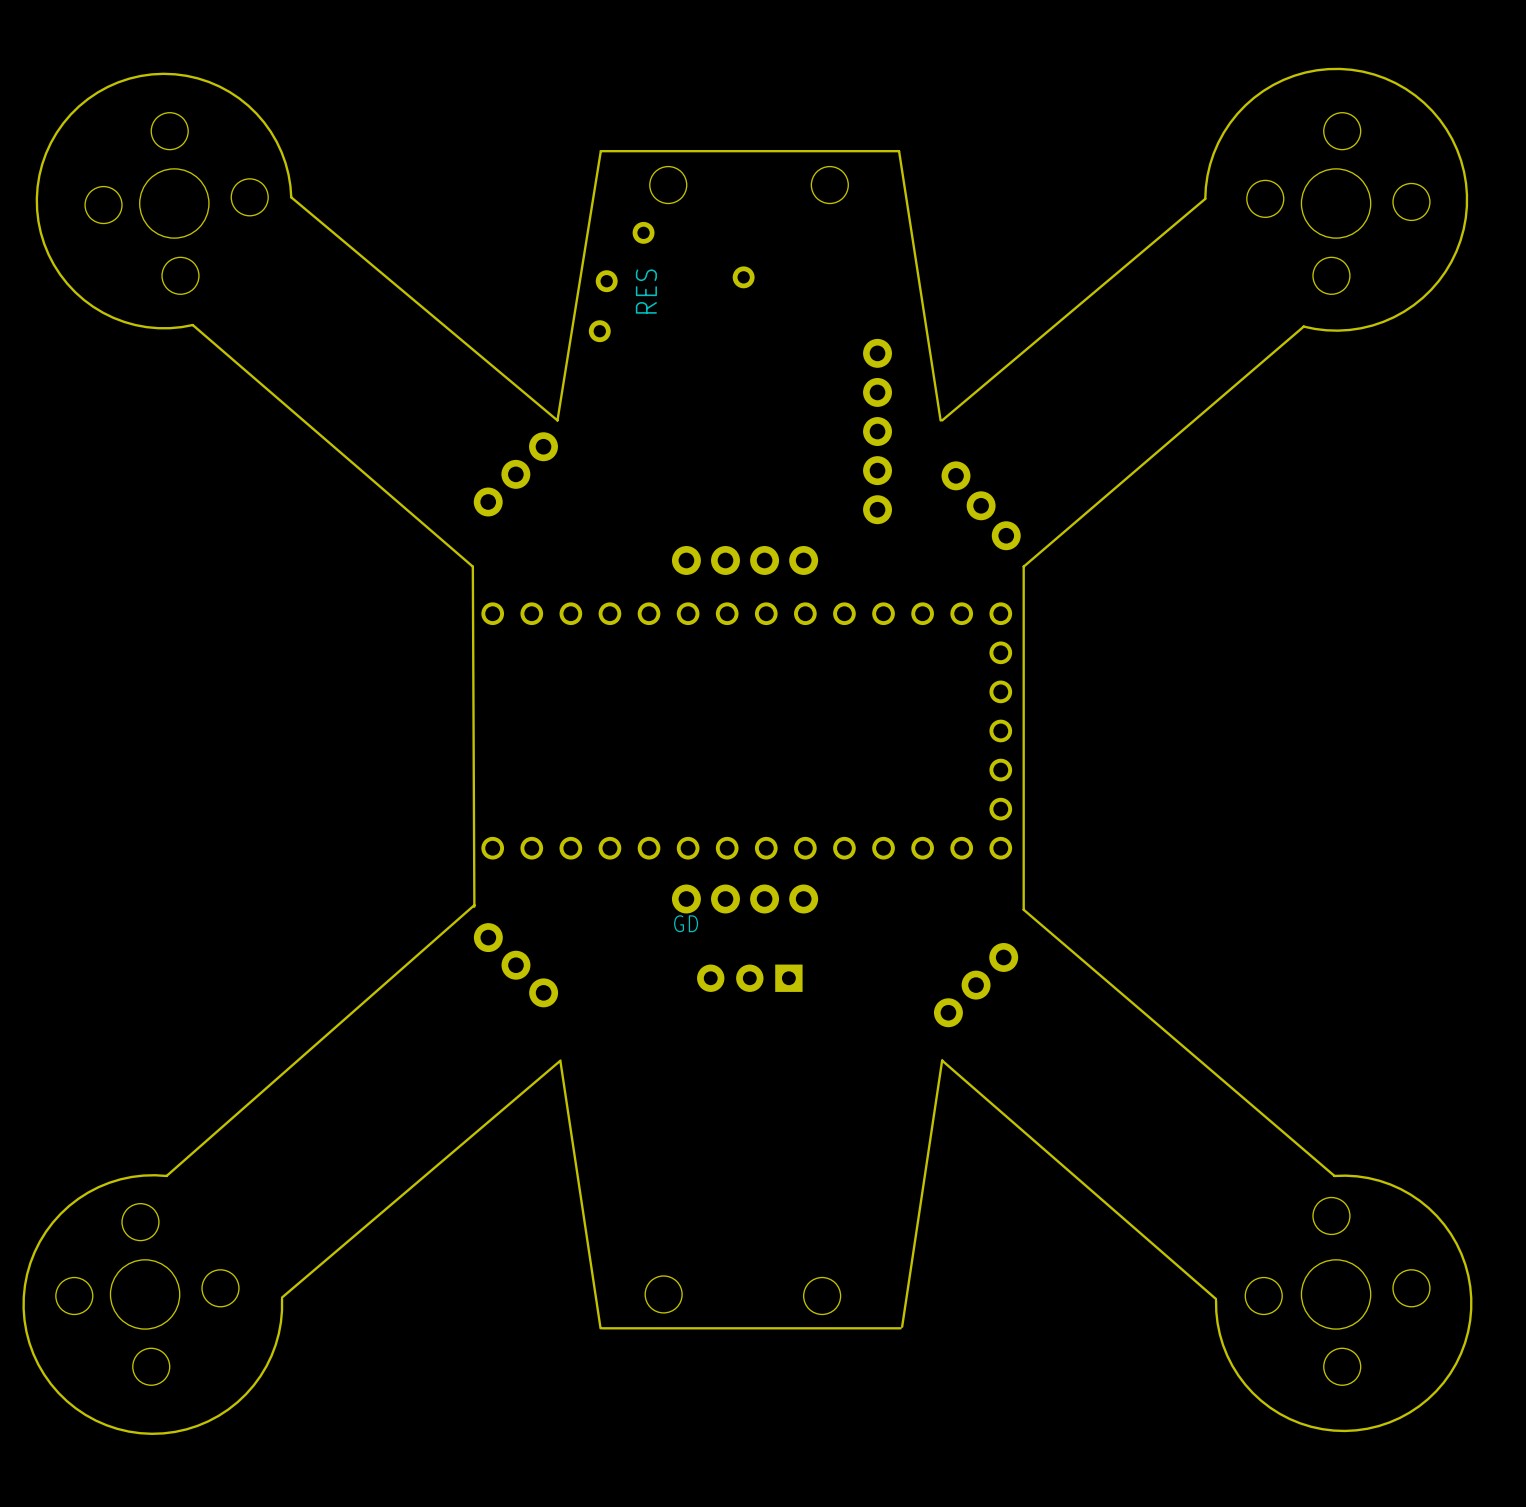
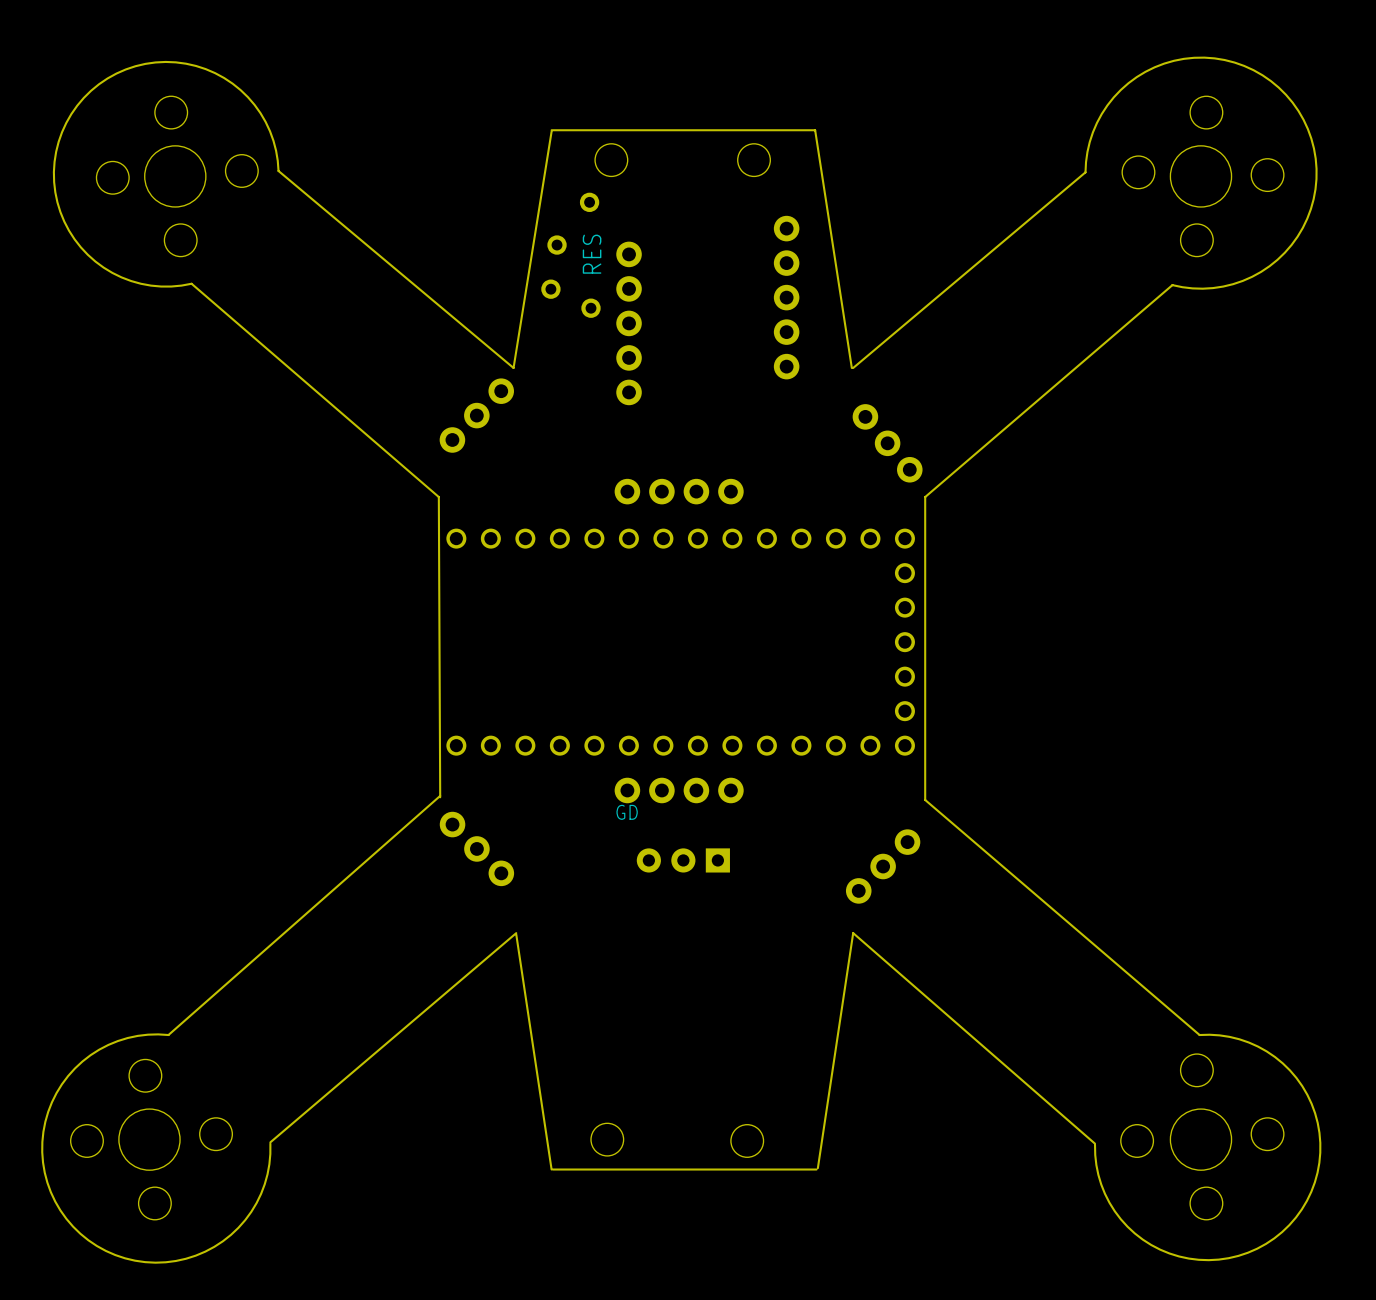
part position: (743, 277) -> (590, 308)
part: none -> (629, 323)
part position: (877, 431) -> (786, 297)

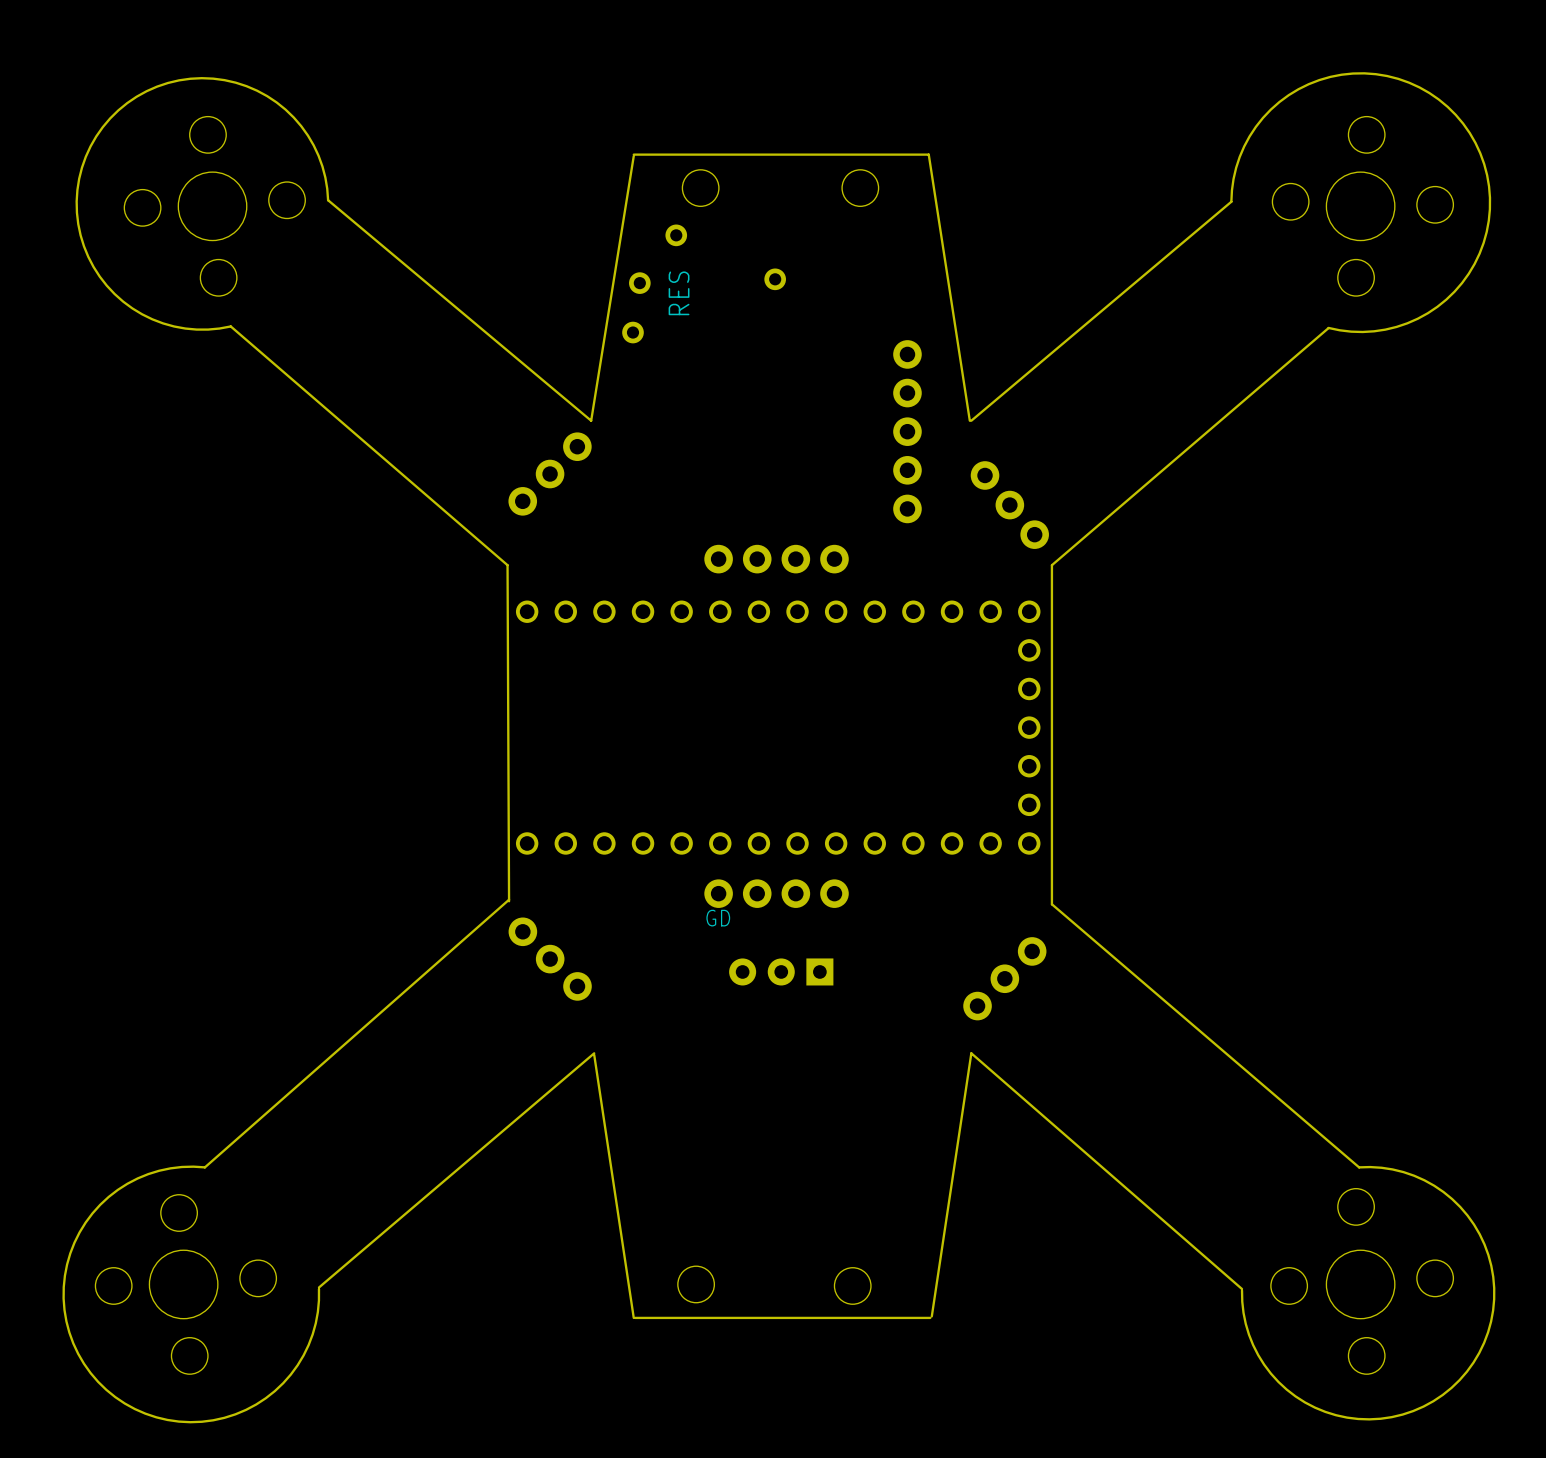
part position: (786, 297) -> (907, 431)
part position: (590, 308) -> (775, 279)
part: (629, 323) -> none

